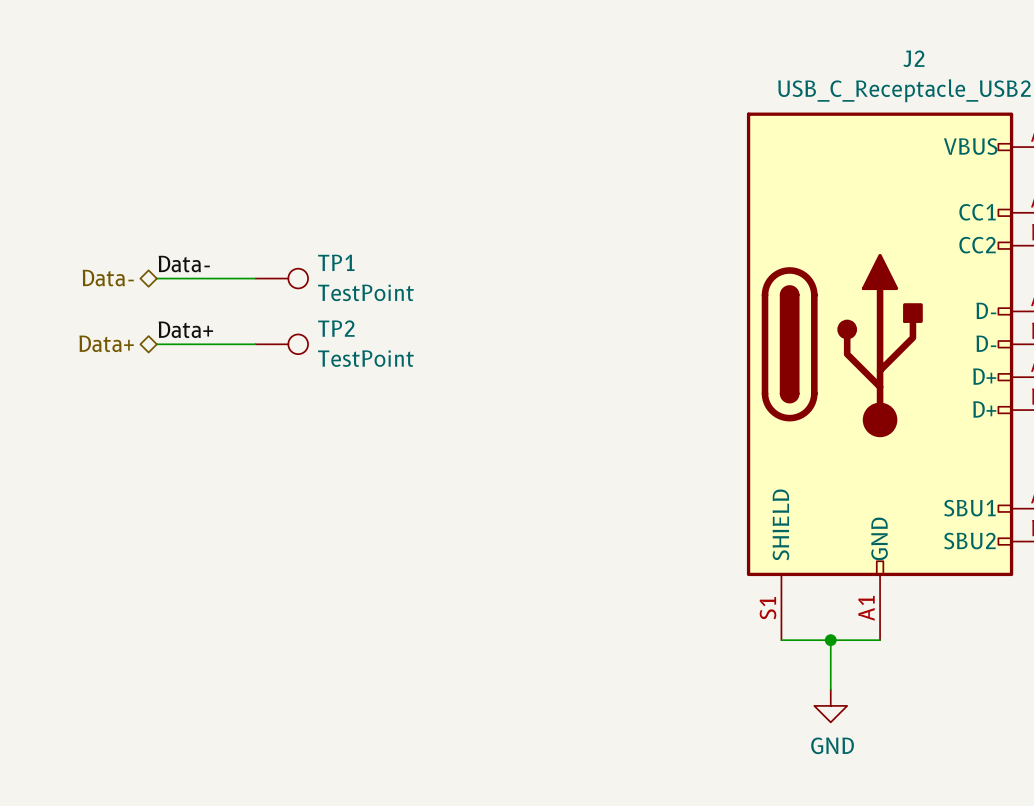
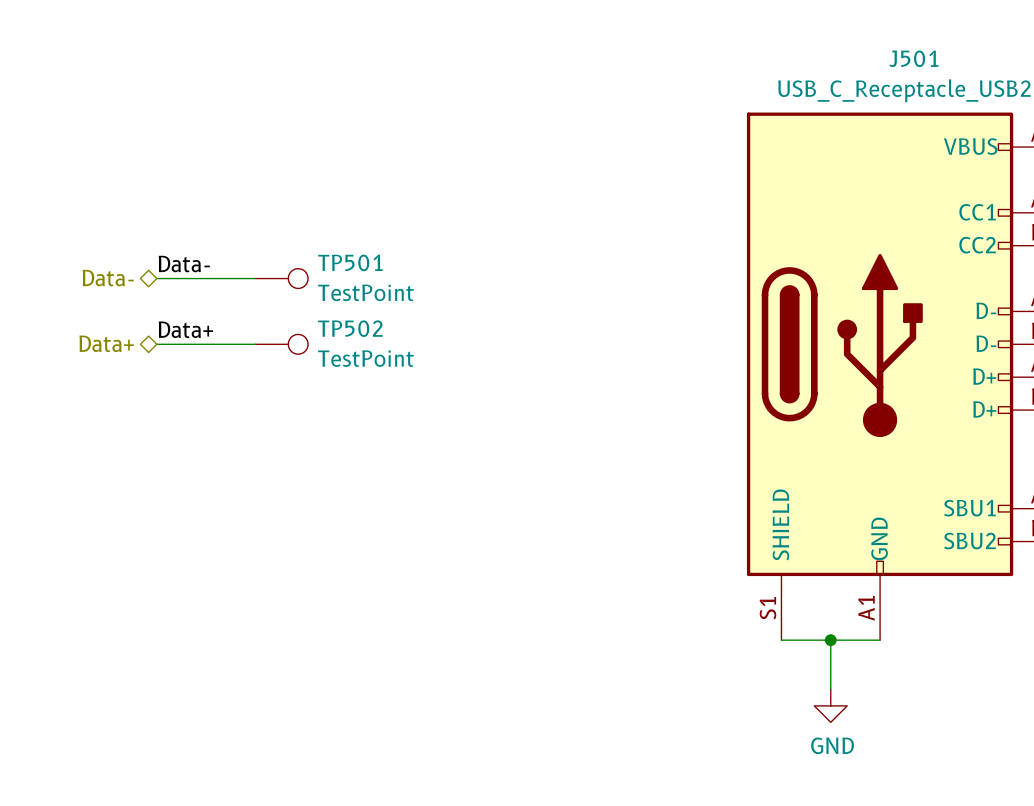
J2 name: J2 (913, 58) -> J501 (913, 58)
TP1 name: TP1 (336, 262) -> TP501 (350, 262)
TP2 name: TP2 (336, 328) -> TP502 (350, 328)

